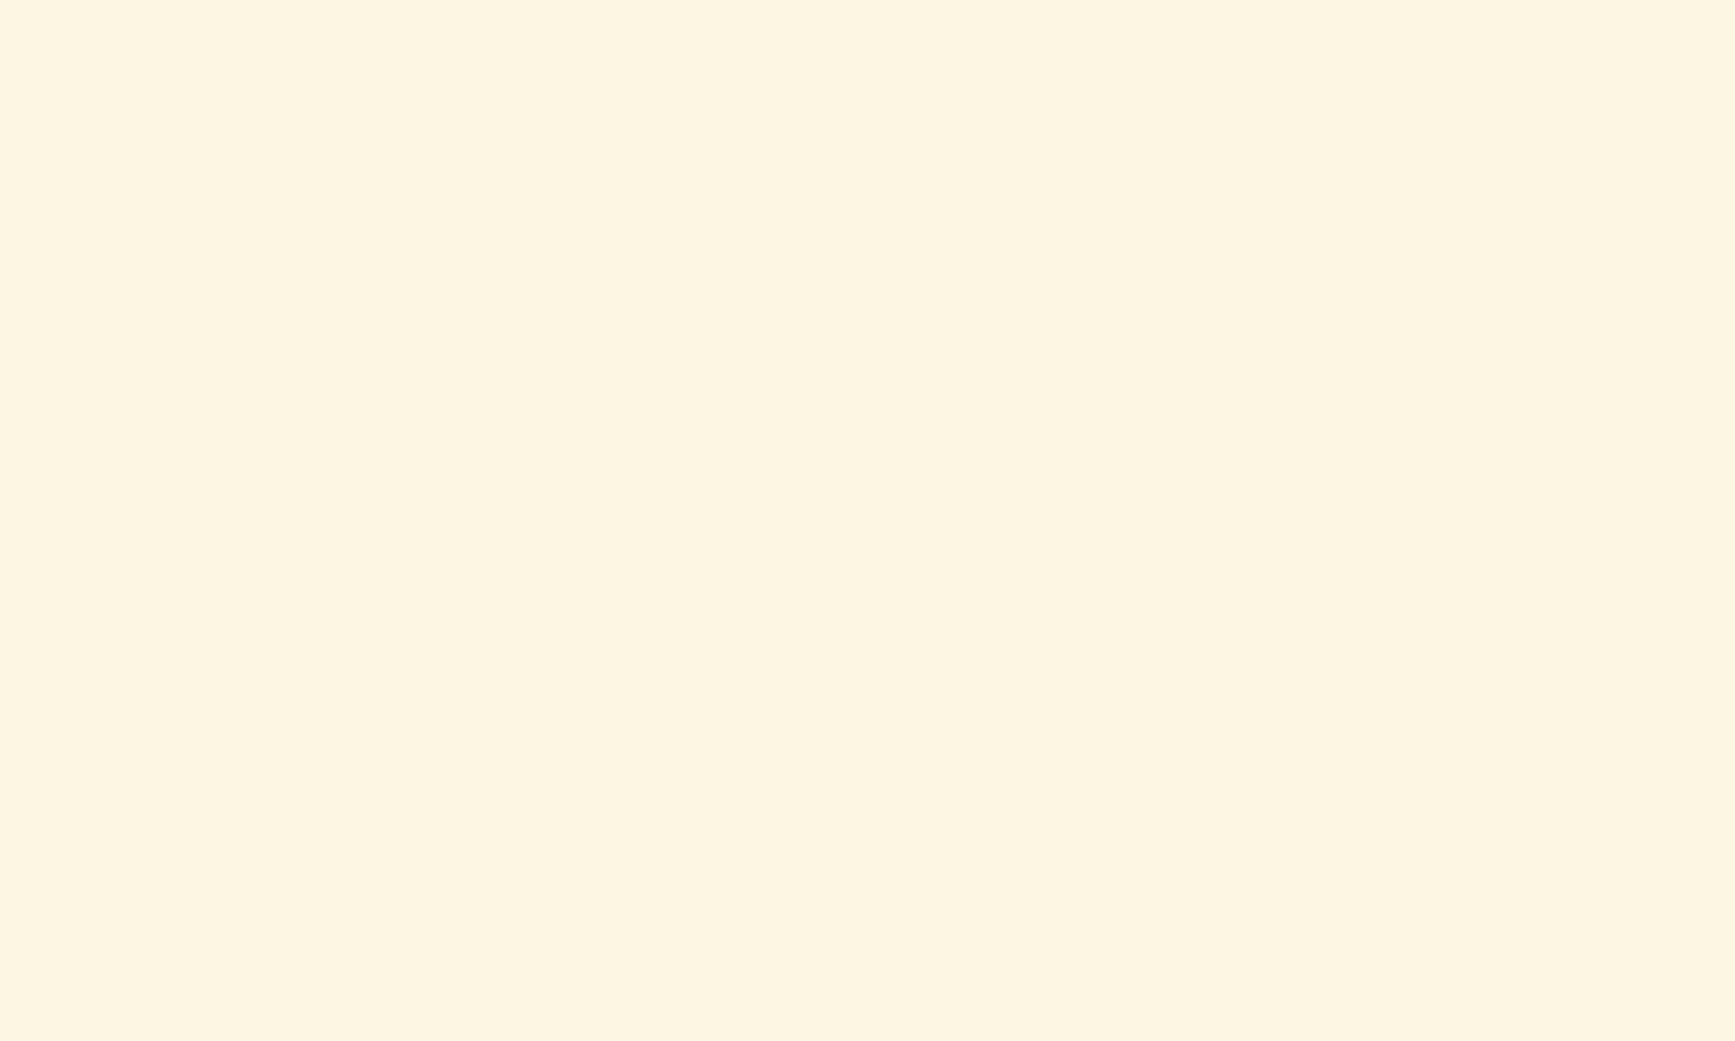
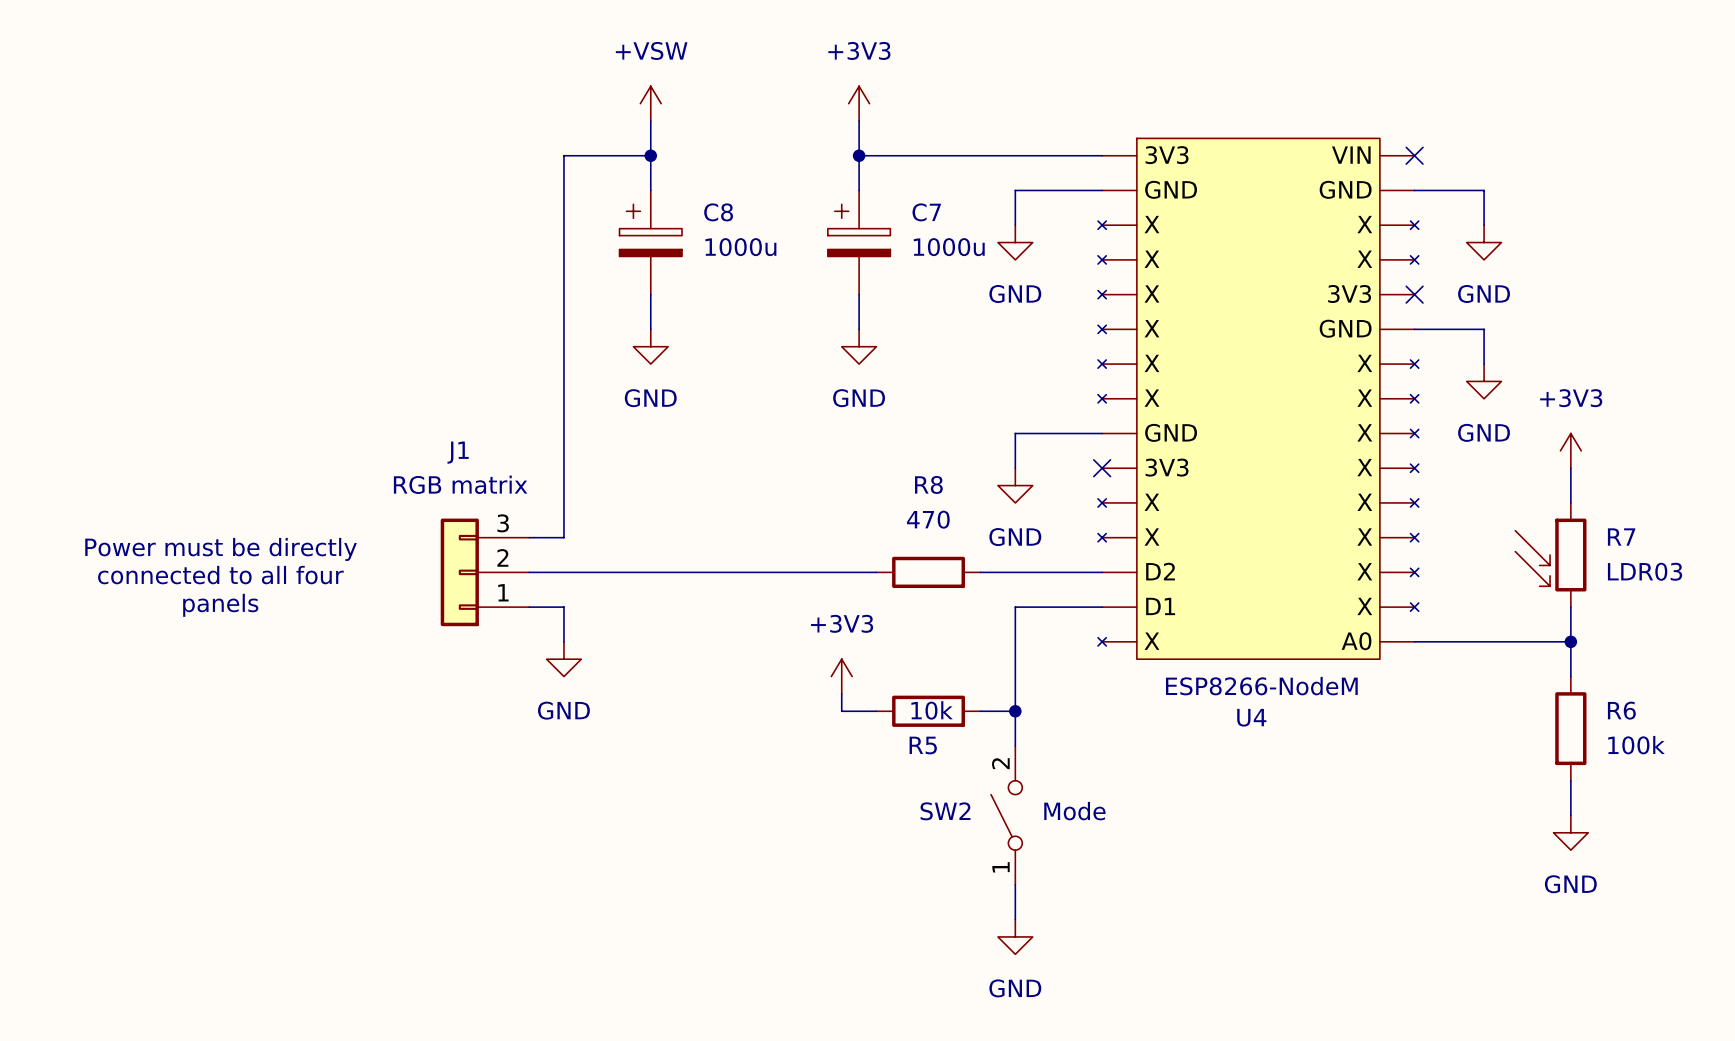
power symbol: none -> +VSW (650, 103)
power symbol: none -> +3V3 (859, 103)
wire: none -> (650, 121) (650, 190)
wire: none -> (859, 121) (859, 190)
wire: none -> (650, 155) (563, 155) (563, 537) (529, 537)
junction: none -> (650, 155)
wire: none -> (859, 155) (1102, 155)
junction: none -> (859, 155)
no-connect mark: none -> (1414, 155)
wire: none -> (1102, 190) (1015, 190) (1015, 225)
wire: none -> (1414, 190) (1484, 190) (1484, 225)
C8: none -> 1000u (650, 242)
C7: none -> 1000u (859, 242)
power symbol: none -> GND (1015, 242)
power symbol: none -> GND (1484, 242)
wire: none -> (650, 294) (650, 329)
wire: none -> (859, 294) (859, 329)
no-connect mark: none -> (1414, 294)
wire: none -> (1414, 329) (1484, 329) (1484, 364)
power symbol: none -> GND (650, 346)
power symbol: none -> GND (859, 346)
power symbol: none -> GND (1484, 381)
U4: none -> ESP8266-NodeM (1258, 398)
wire: none -> (1102, 433) (1015, 433) (1015, 468)
power symbol: none -> +3V3 (1570, 450)
no-connect mark: none -> (1102, 468)
wire: none -> (1570, 468) (1570, 502)
power symbol: none -> GND (1015, 485)
text: none -> Power must be directly (221, 549)
R7: none -> LDR03 (1550, 555)
J1: none -> RGB matrix (484, 572)
wire: none -> (529, 572) (876, 572)
R8: none -> 470 (928, 572)
wire: none -> (980, 572) (1102, 572)
text: none -> connected to all four (220, 575)
text: none -> panels (220, 605)
wire: none -> (529, 607) (563, 607) (563, 641)
wire: none -> (1102, 607) (1015, 607) (1015, 745)
wire: none -> (1570, 607) (1570, 676)
wire: none -> (1414, 641) (1570, 641)
junction: none -> (1570, 641)
power symbol: none -> GND (563, 659)
power symbol: none -> +3V3 (841, 676)
wire: none -> (841, 693) (841, 711) (876, 711)
R5: none -> 10k (928, 711)
wire: none -> (980, 711) (1015, 711)
junction: none -> (1015, 711)
R6: none -> 100k (1570, 728)
wire: none -> (1570, 780) (1570, 815)
SW2: none -> Mode (1006, 815)
power symbol: none -> GND (1570, 832)
wire: none -> (1015, 884) (1015, 919)
power symbol: none -> GND (1015, 936)

